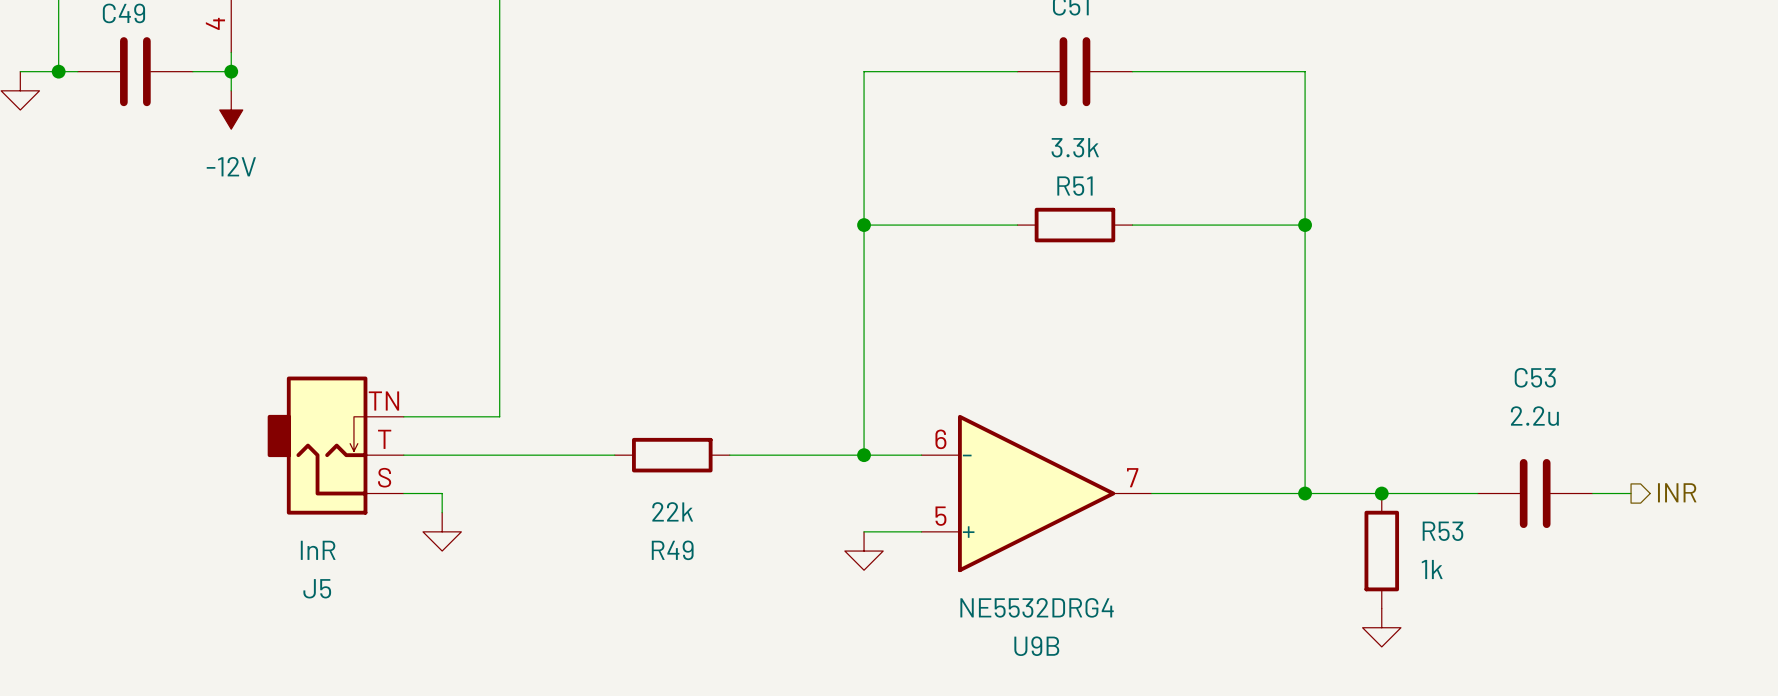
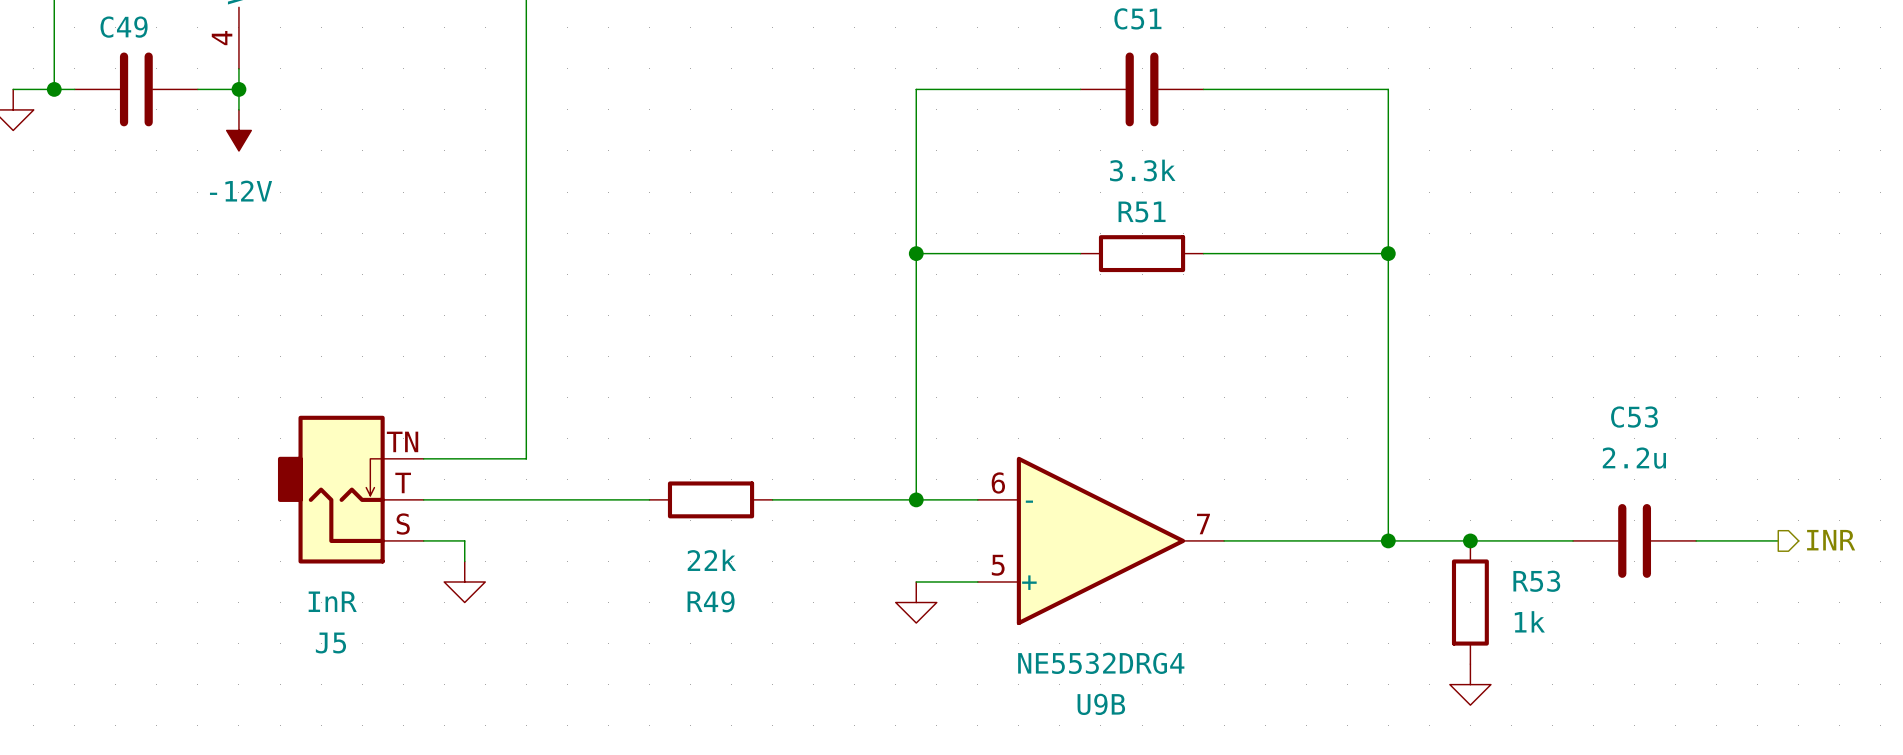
hierarchical label position: INR (1677, 492) -> INR (1831, 540)
wire: none -> (1737, 540) (1778, 540)

